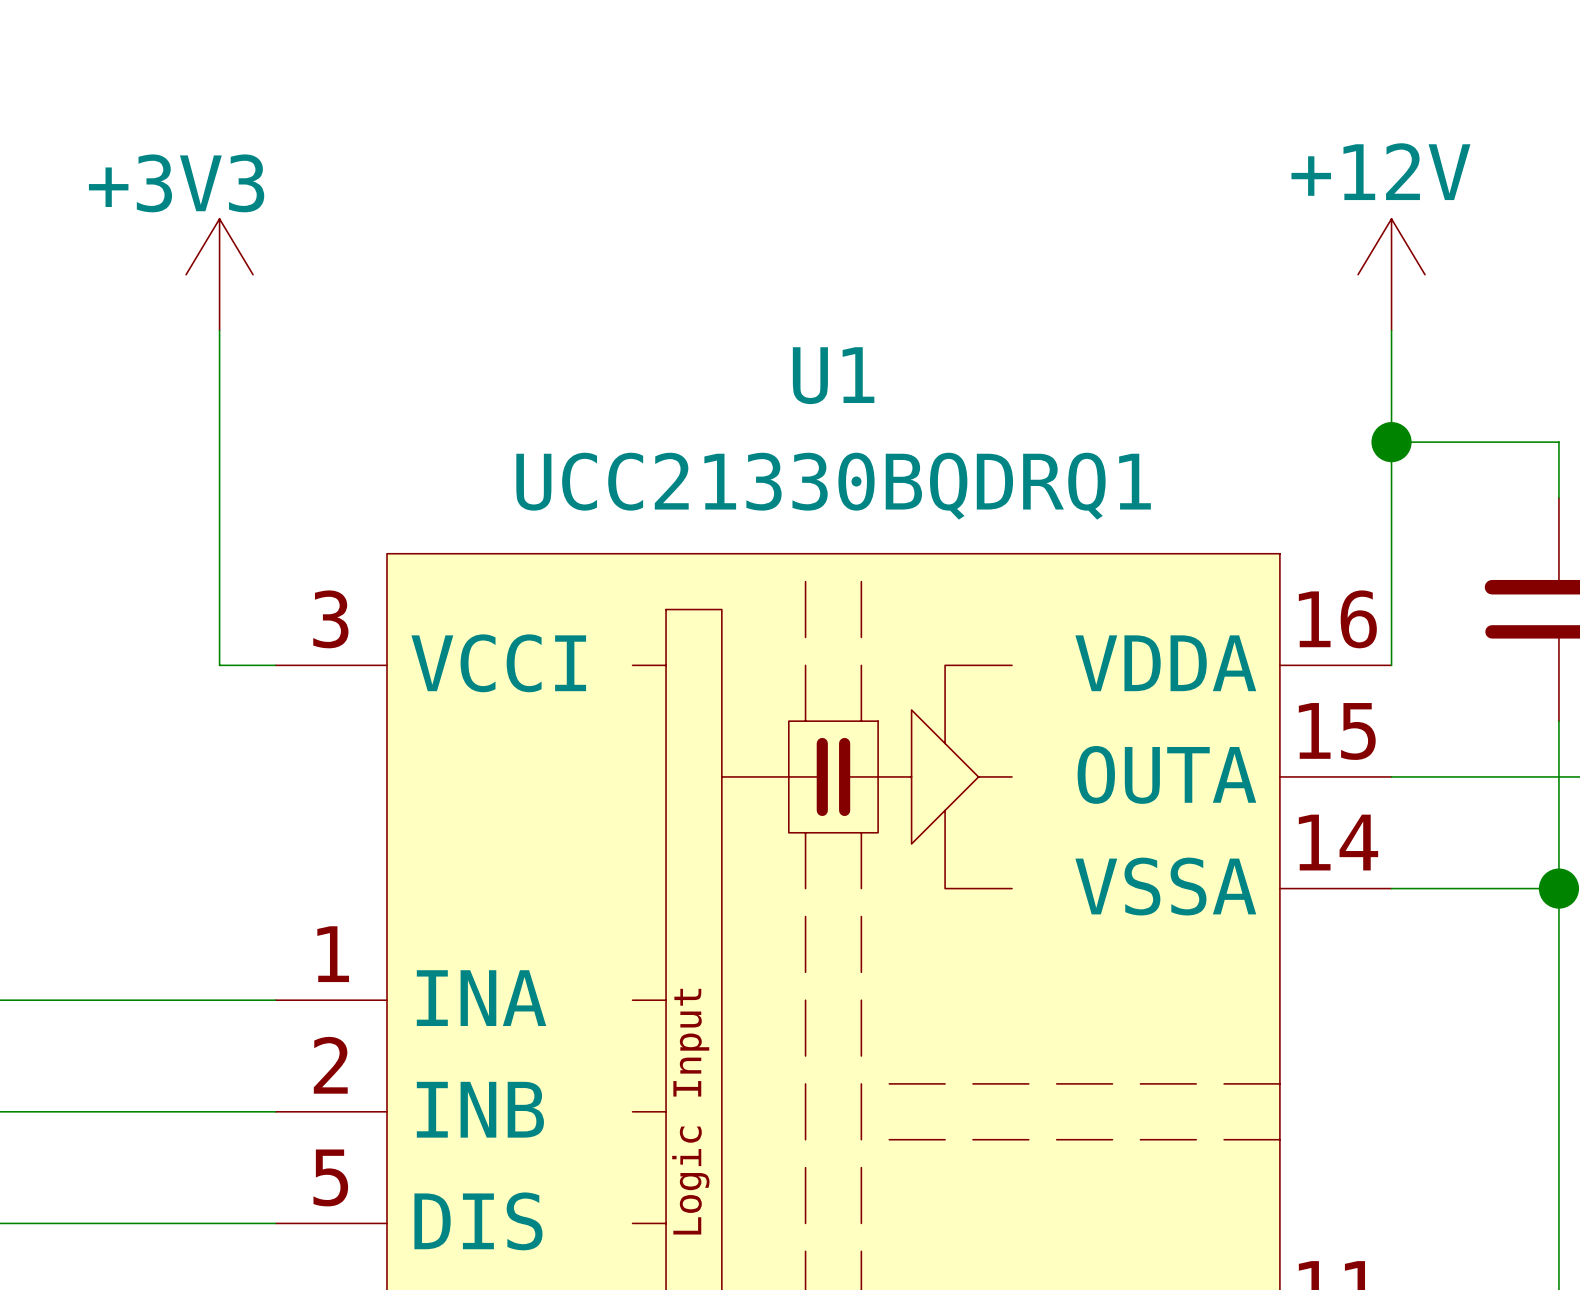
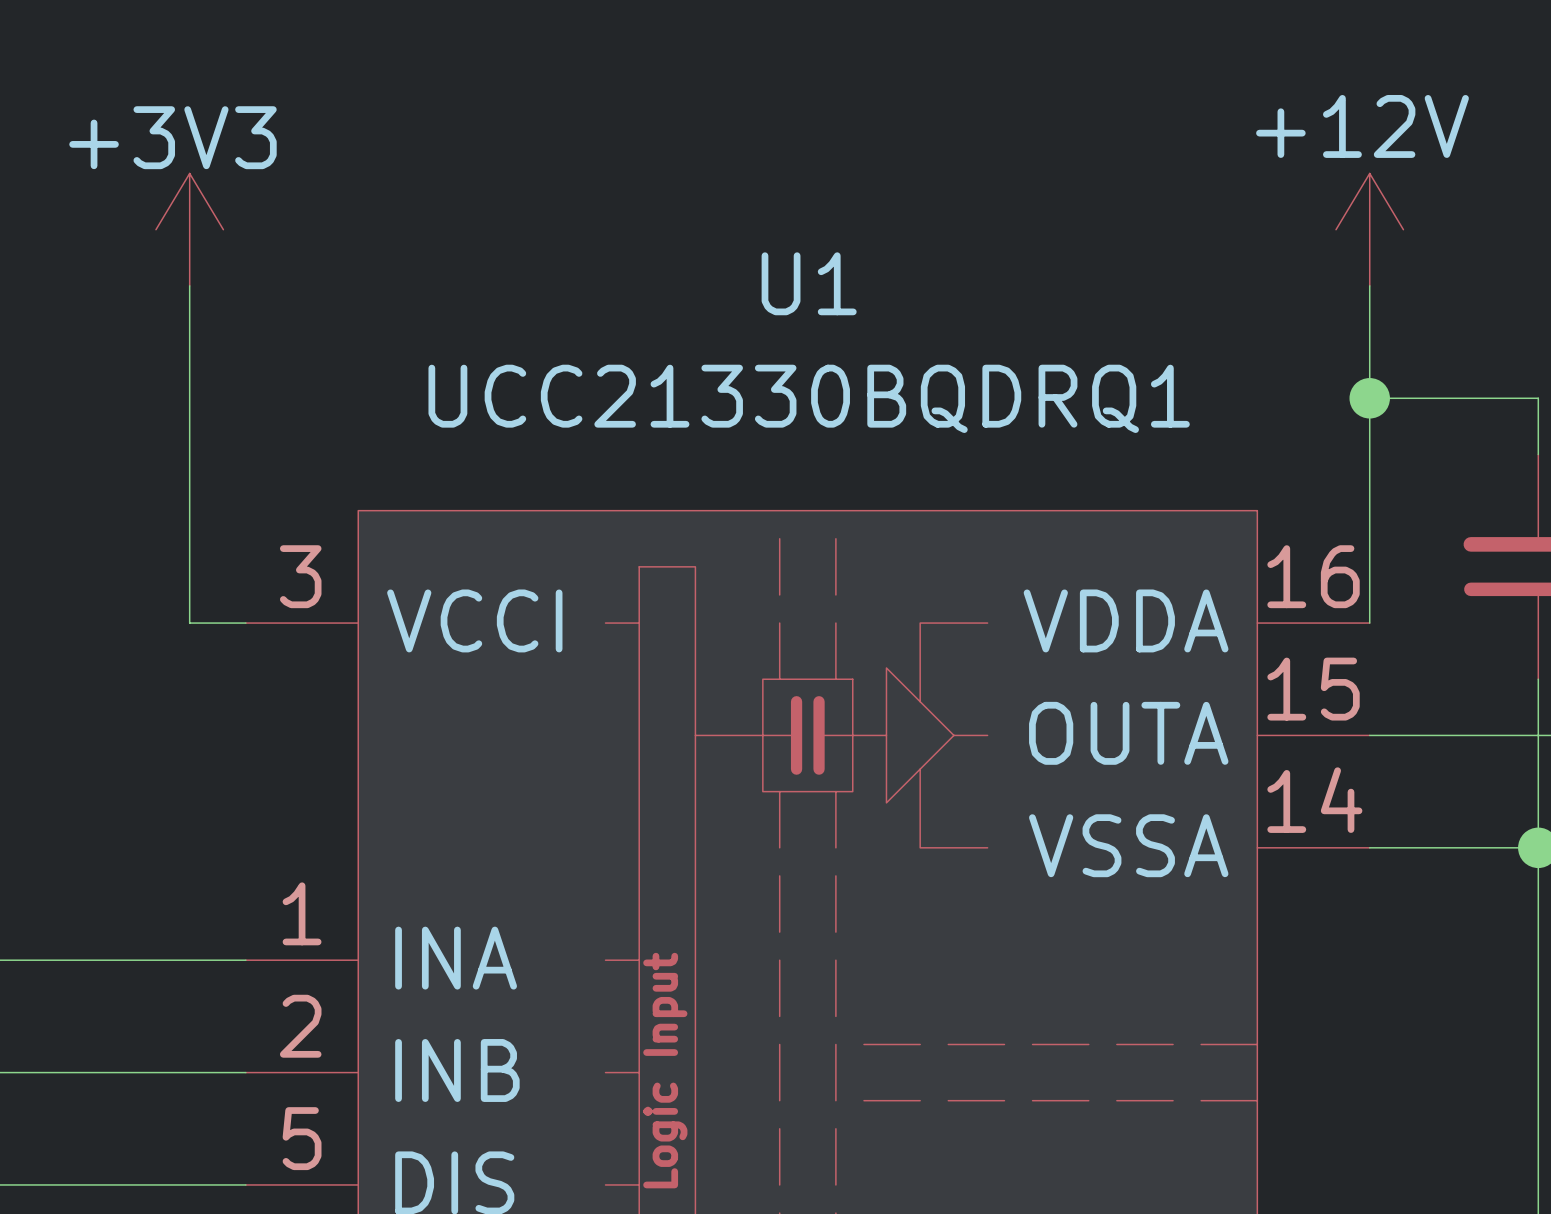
U1 name position: U1 (833, 375) -> U1 (809, 283)
U1 value position: UCC21330BQDRQ1 (833, 486) -> UCC21330BQDRQ1 (809, 398)

